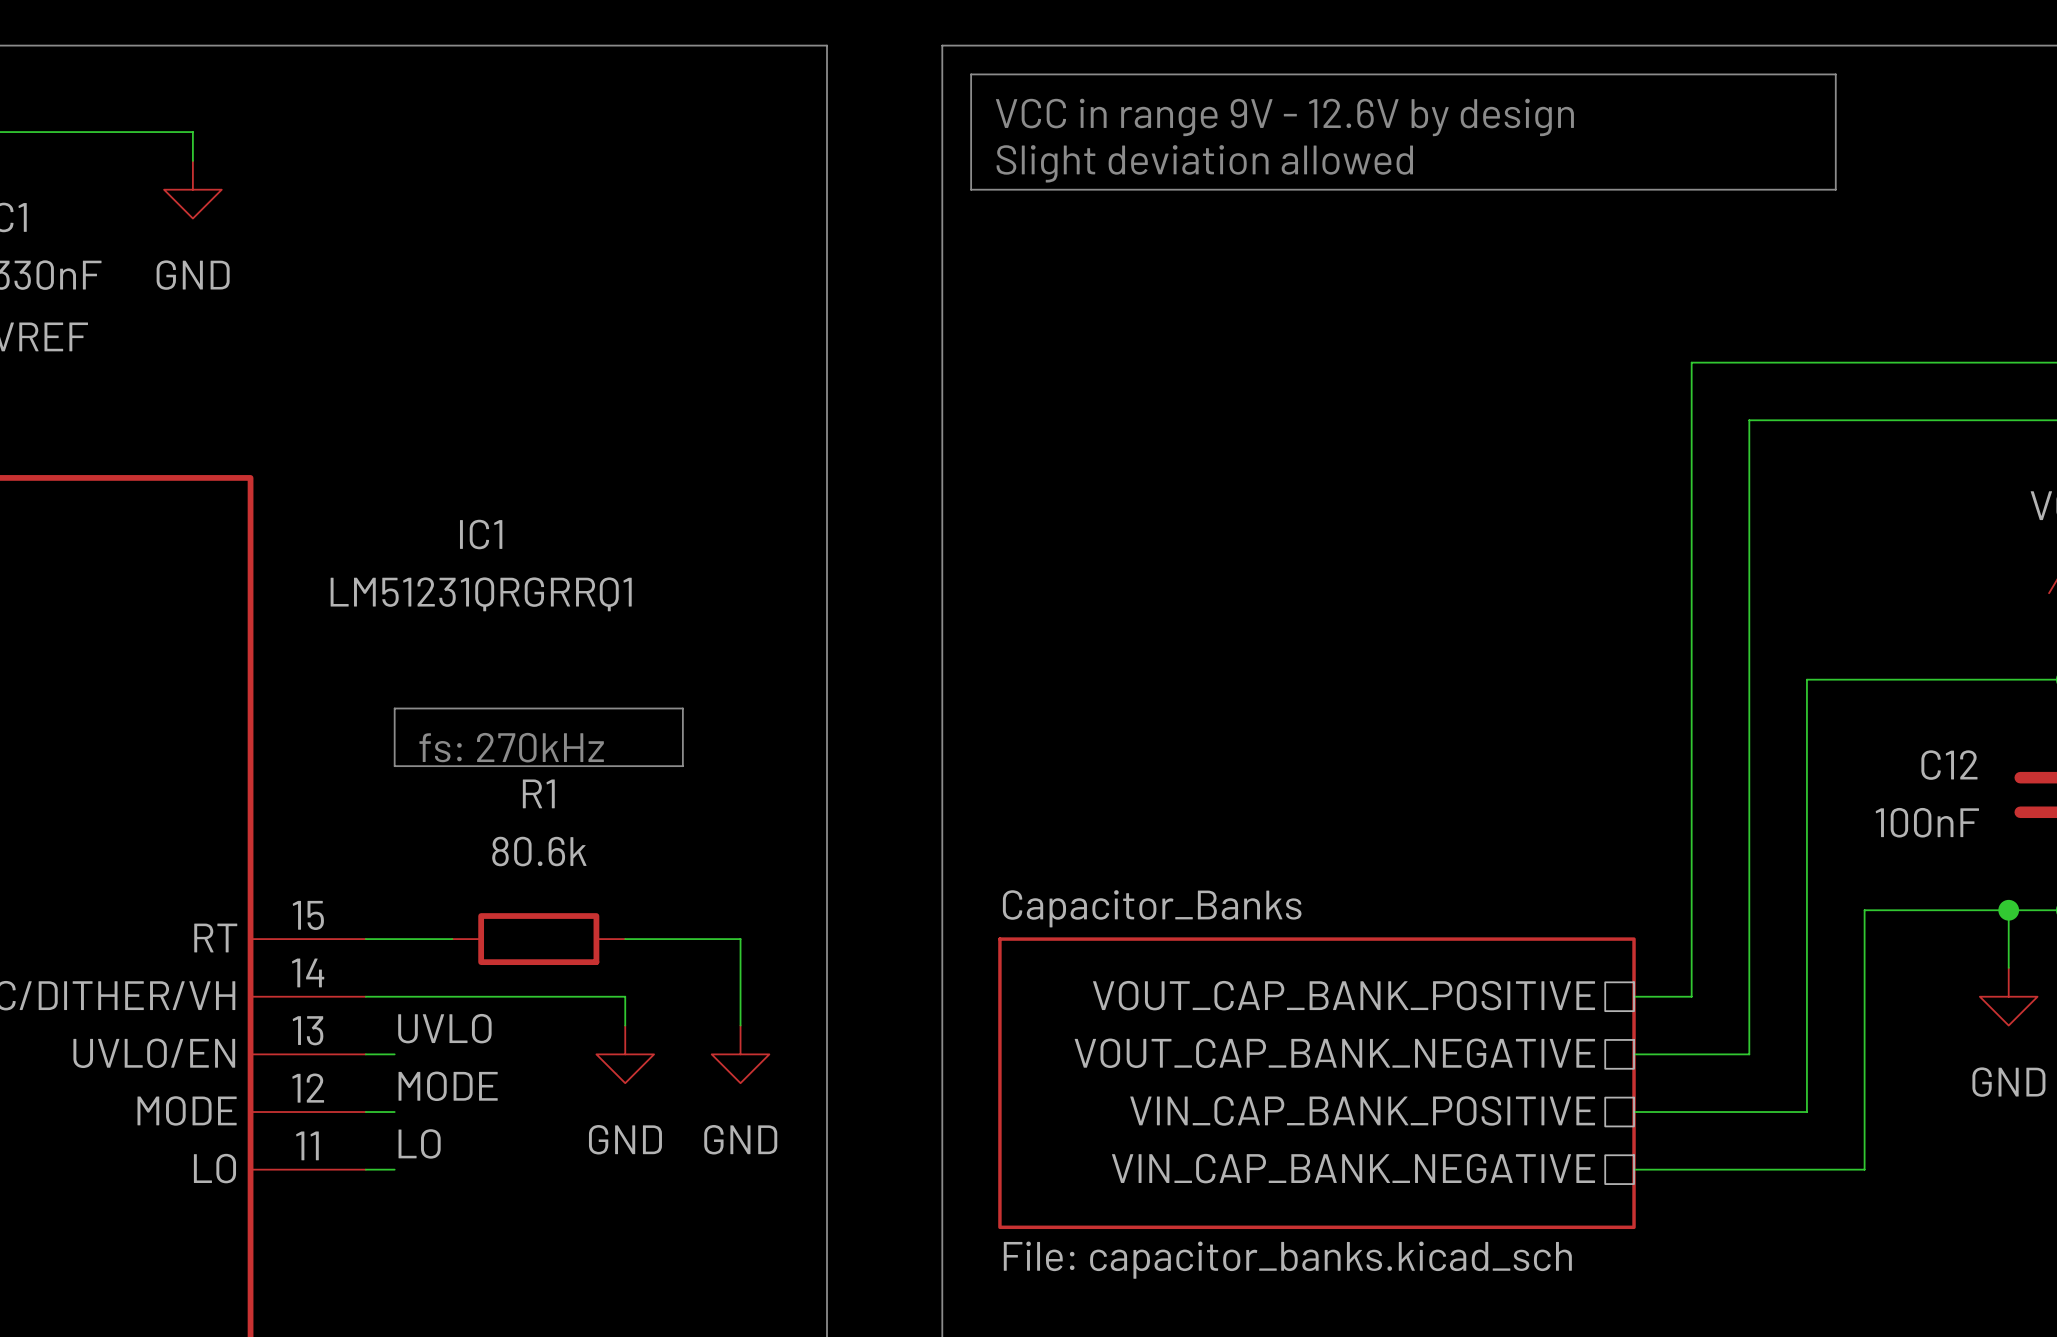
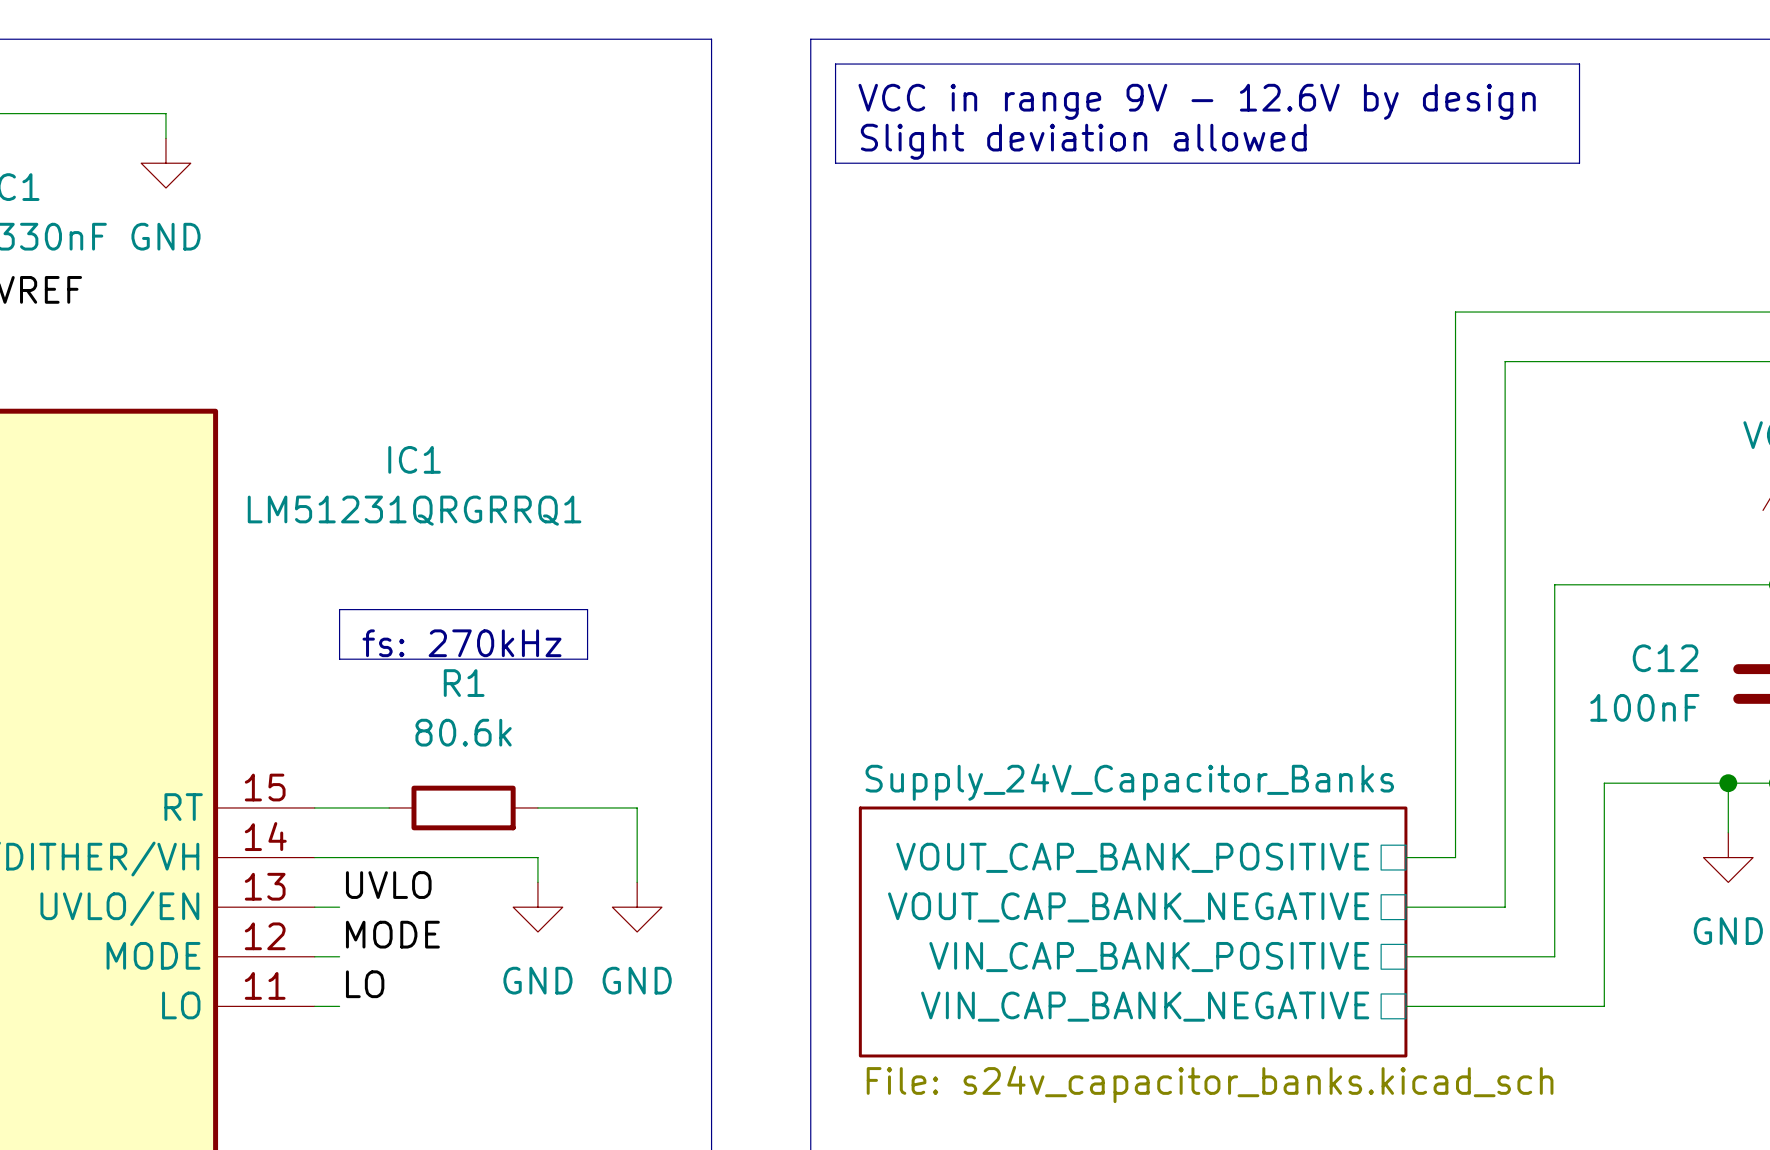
sheet Capacitor_Banks name: Capacitor_Banks (1152, 908) -> Supply_24V_Capacitor_Banks (1129, 782)
sheet Capacitor_Banks value: File: capacitor_banks.kicad_sch (1287, 1260) -> File: s24v_capacitor_banks.kicad_sch (1210, 1084)

